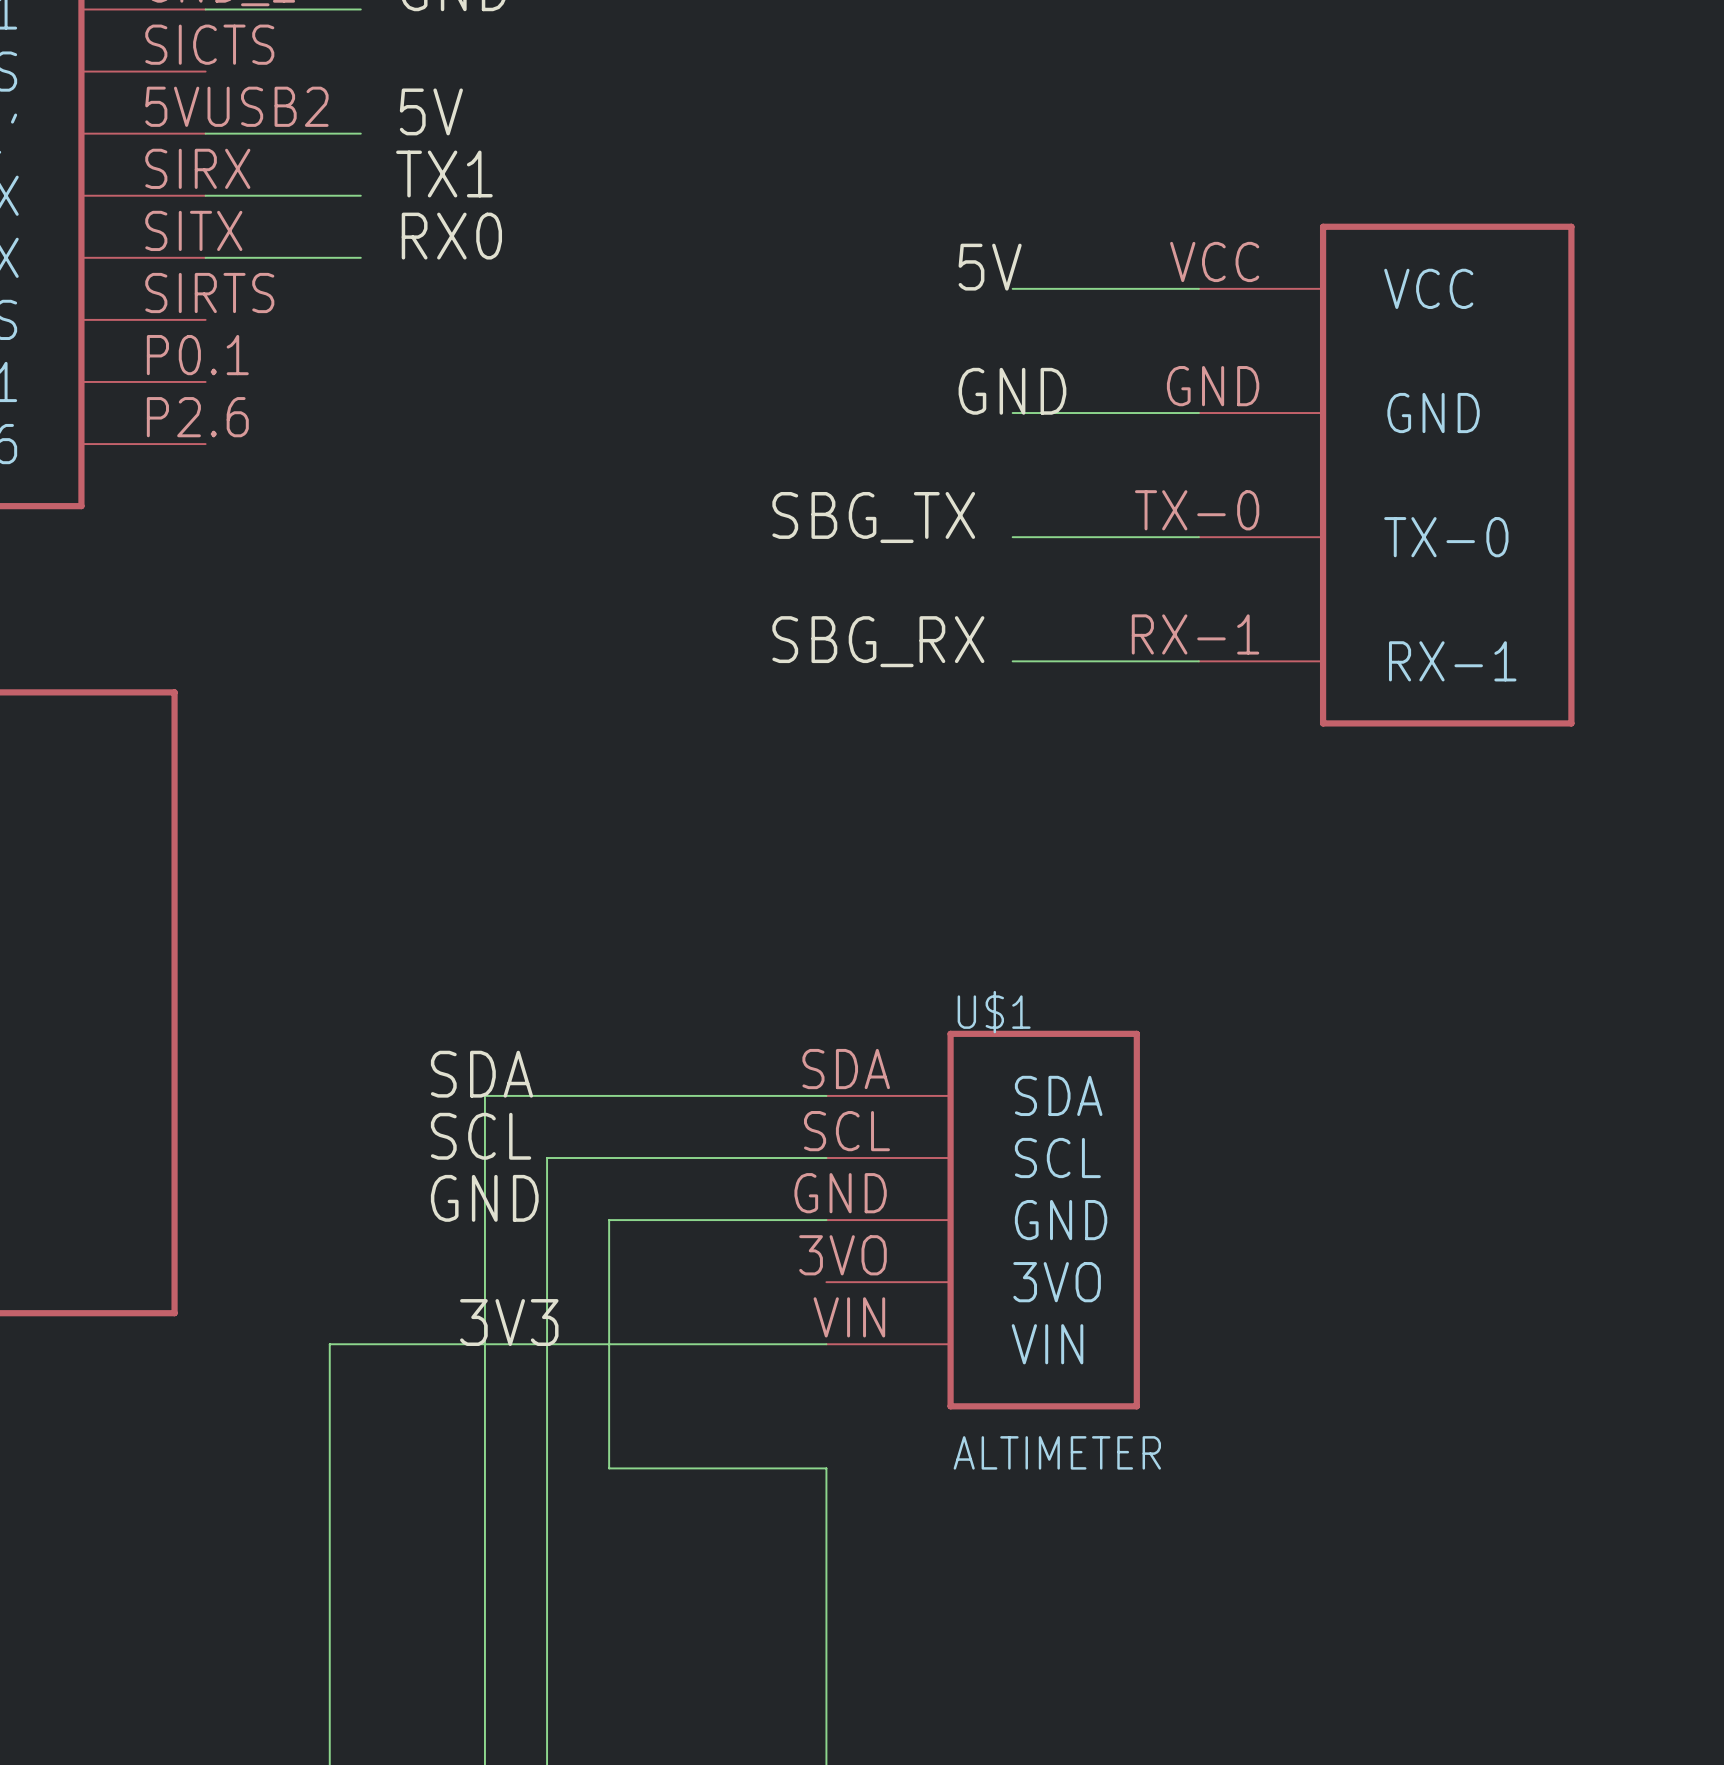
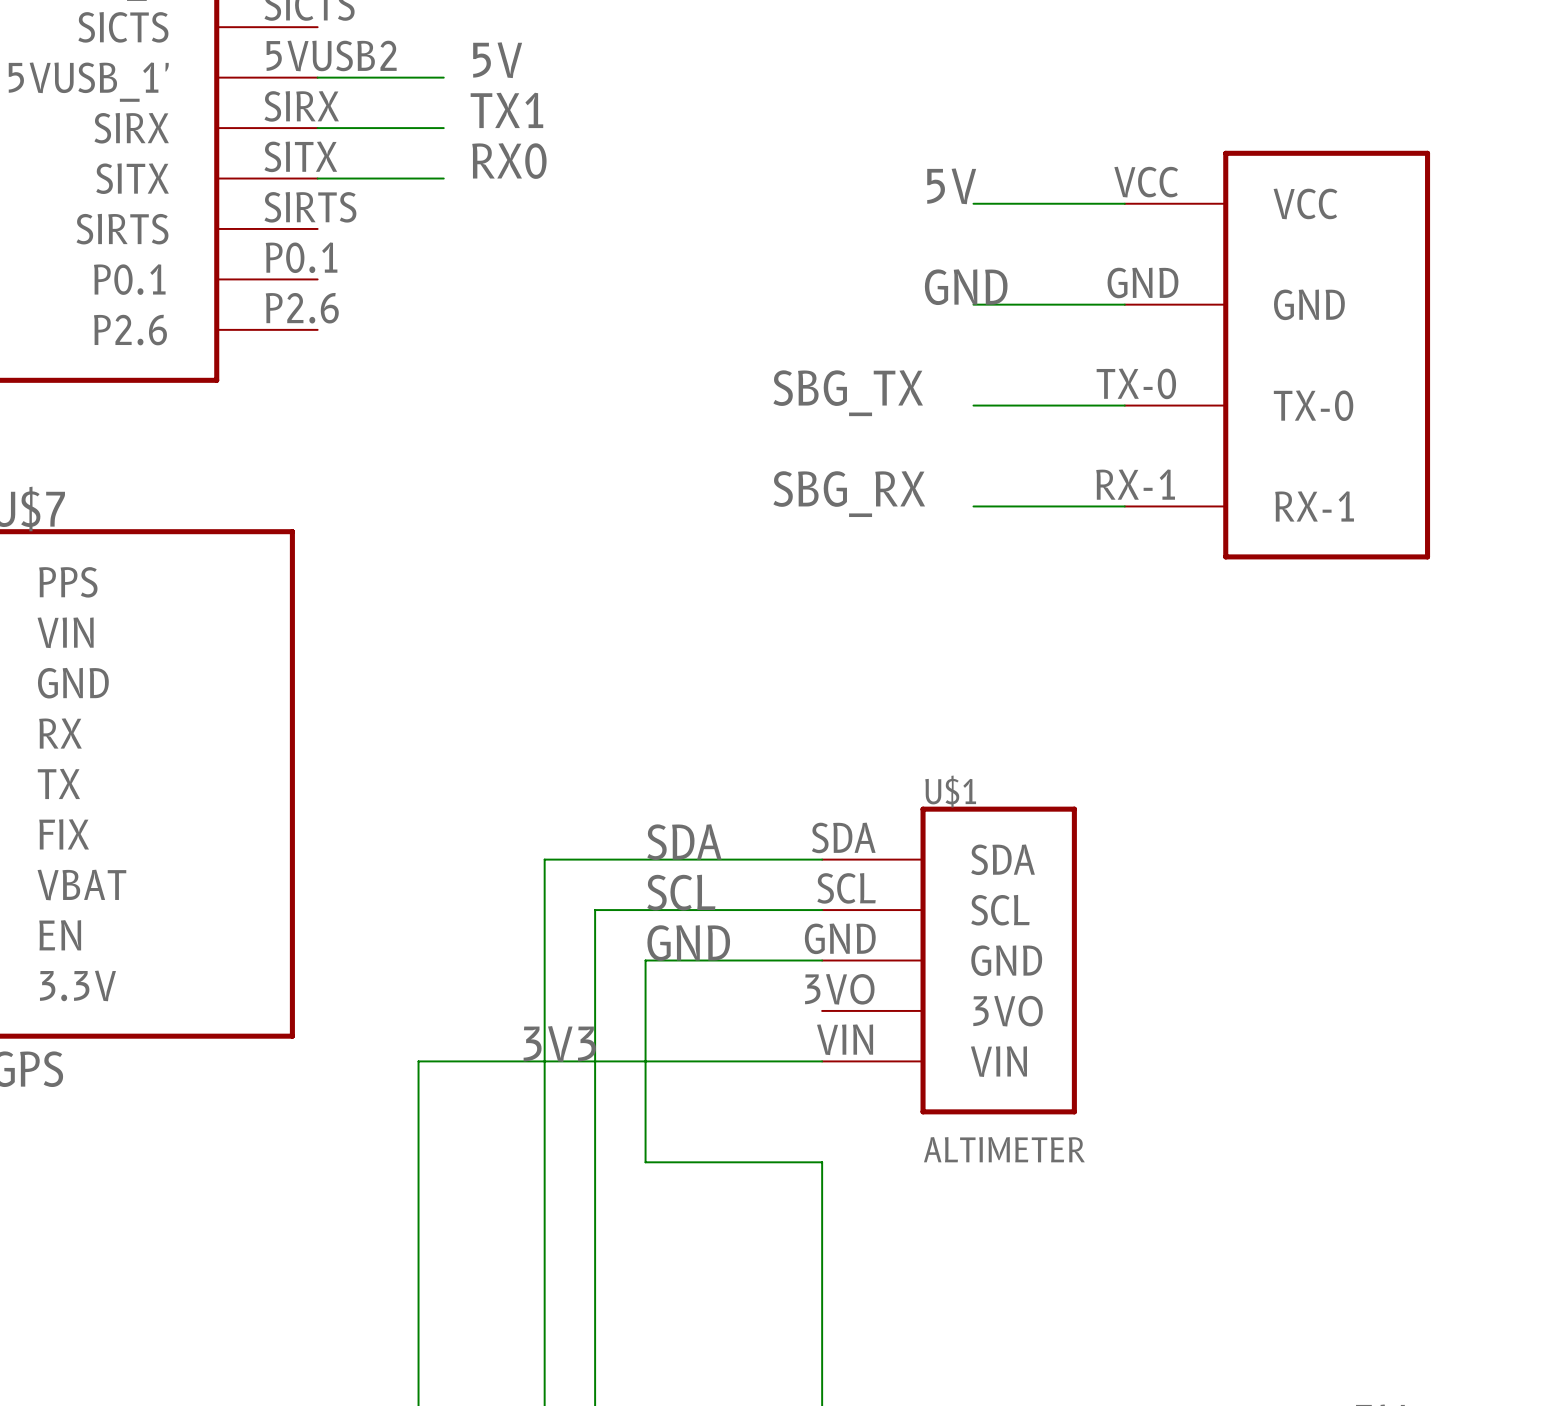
label position: SDA (481, 1074) -> SDA (684, 842)
label position: SCL (481, 1136) -> SCL (681, 892)
label position: GND (484, 1198) -> GND (688, 943)

